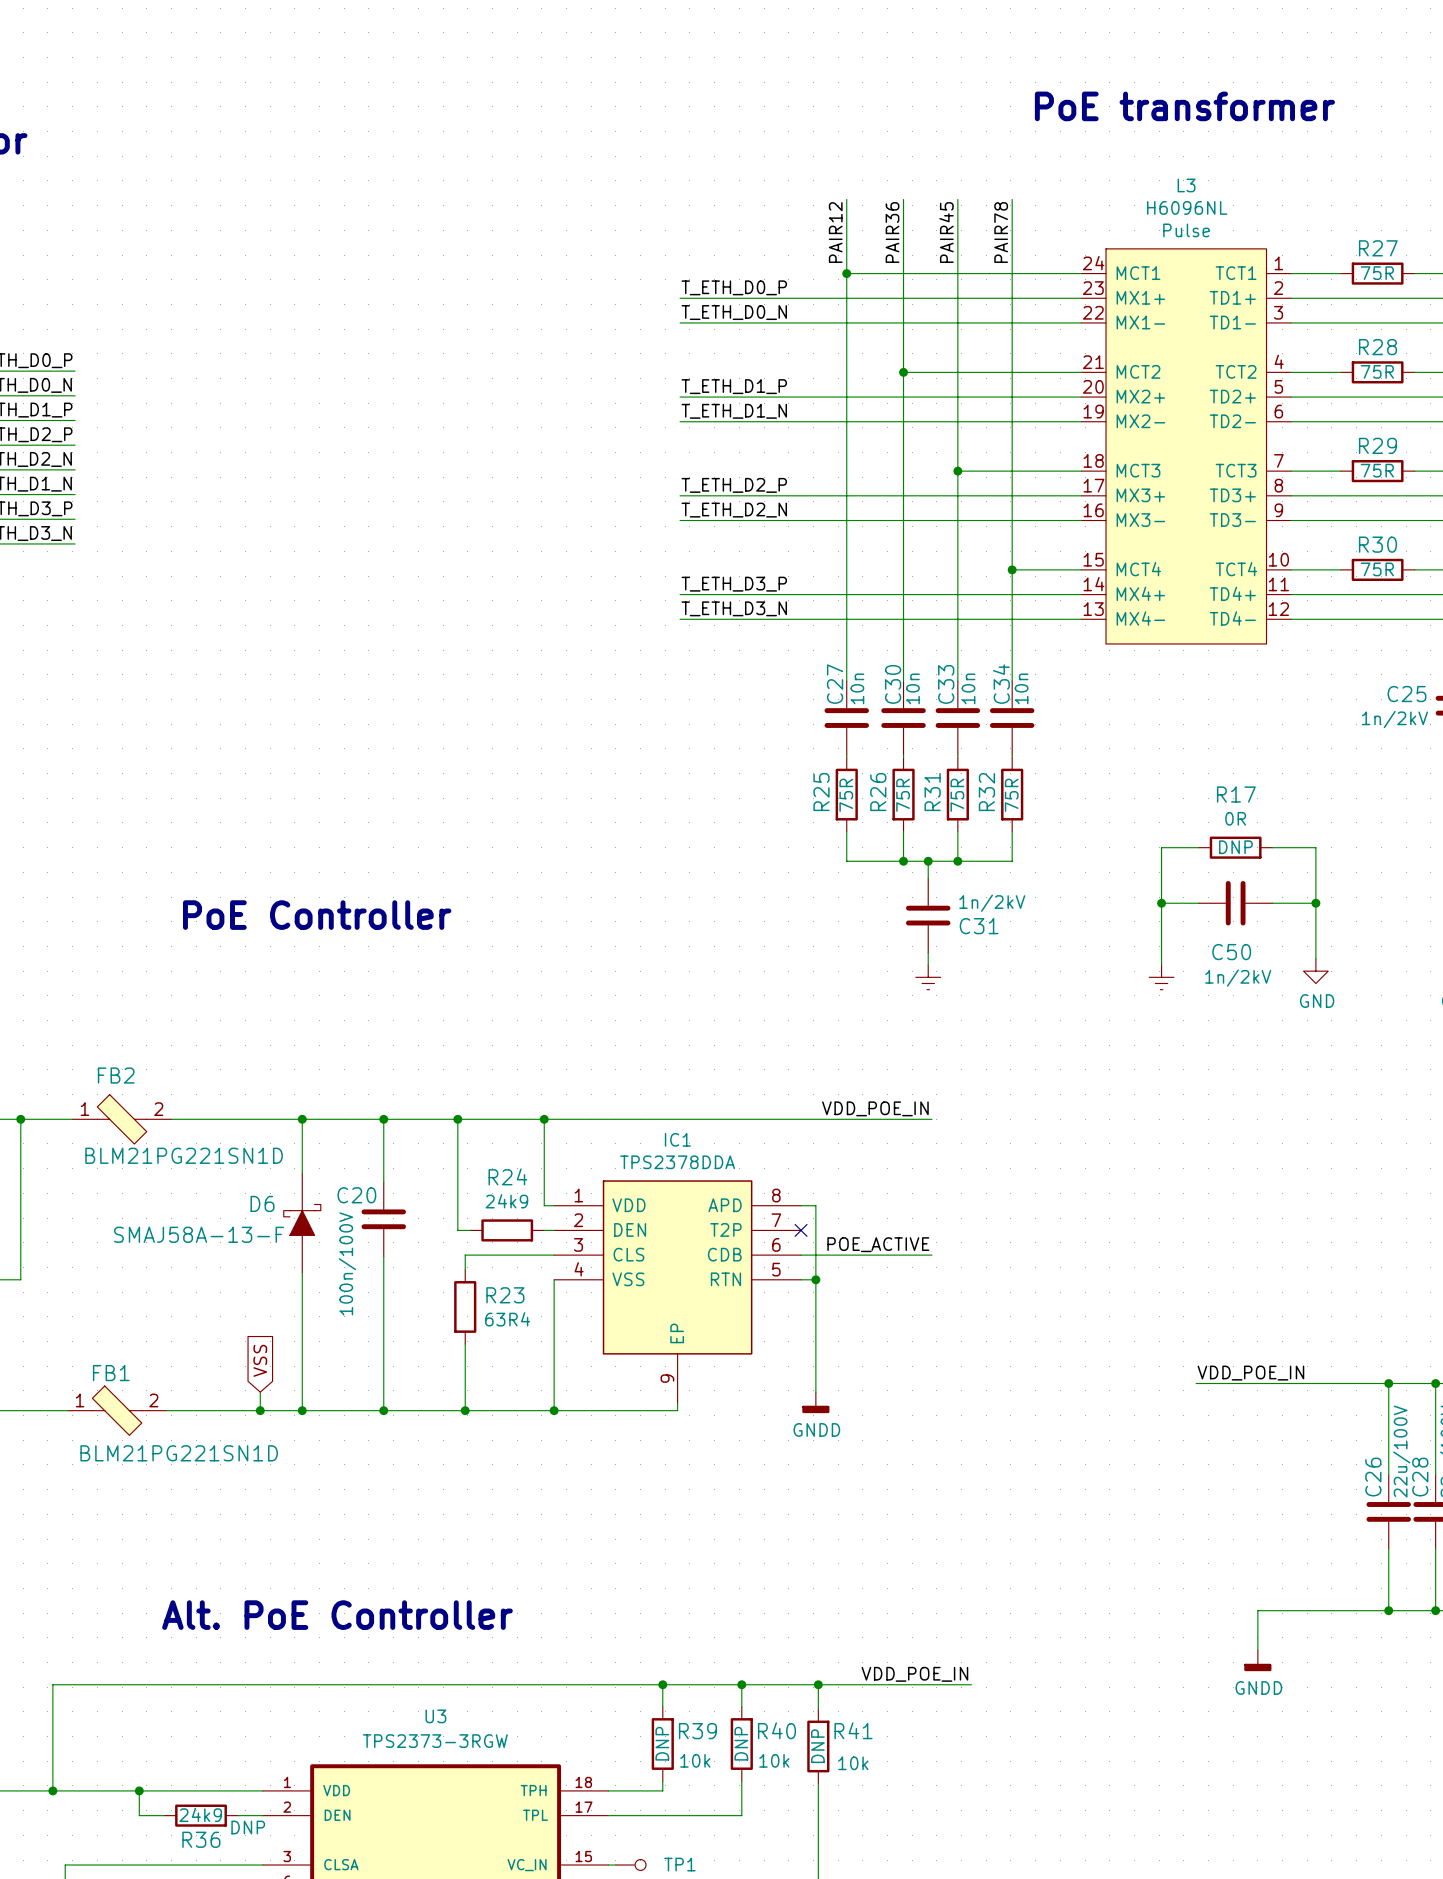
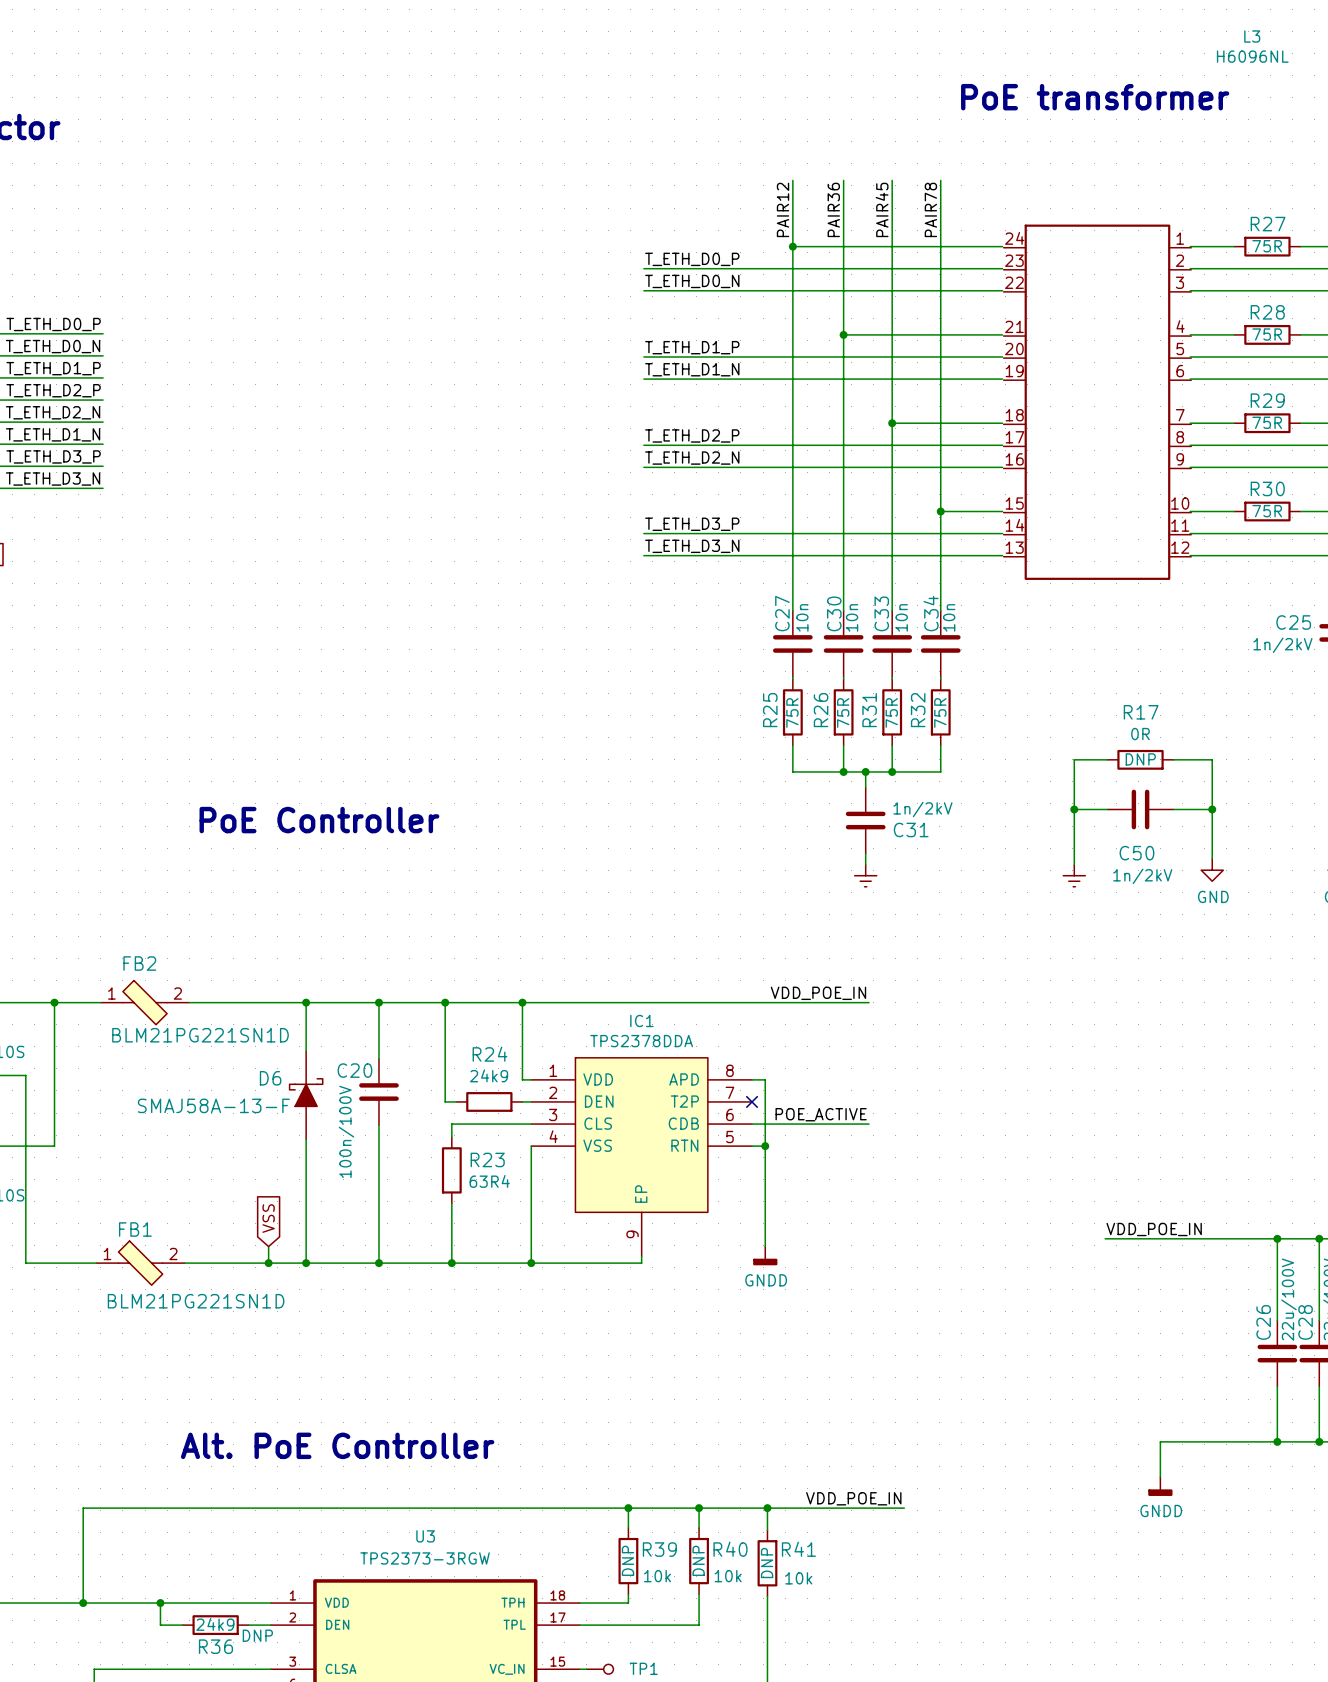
L3 name position: L3 (1186, 185) -> L3 (1252, 36)
L3 value position: H6096NL (1187, 207) -> H6096NL (1252, 56)
L3 text: Pulse (1186, 230) -> none
L3 symbol: [1081, 248, 1292, 644] -> [1003, 224, 1192, 580]

